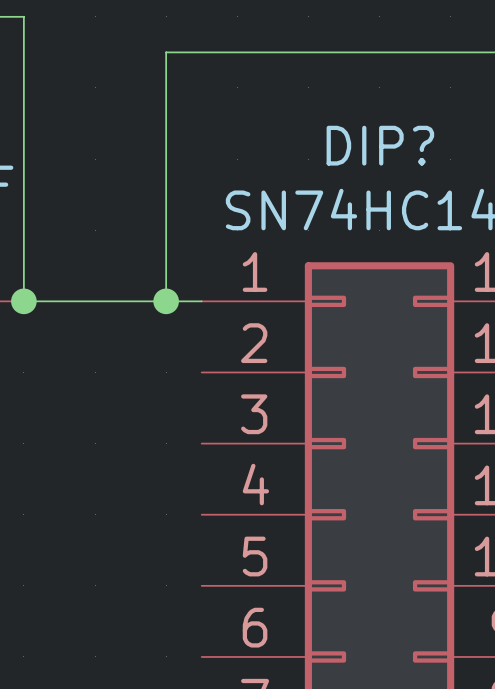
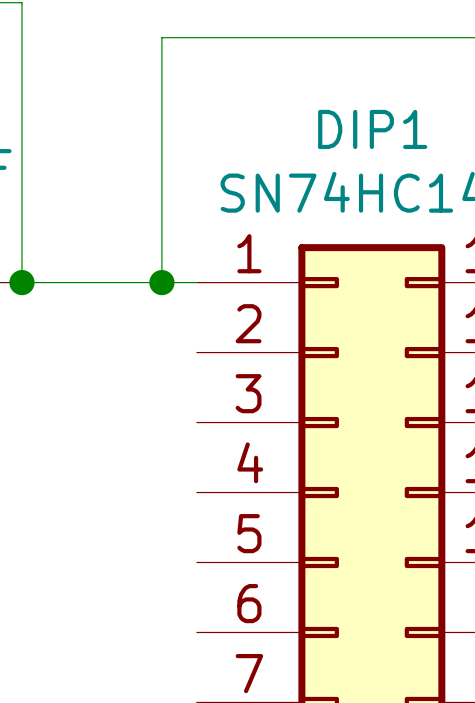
DIP? name: DIP? (380, 145) -> DIP1 (372, 129)

